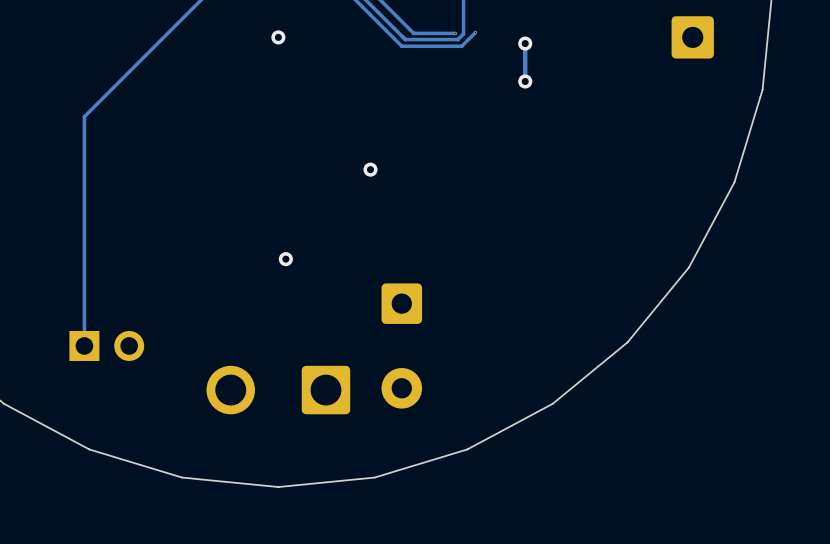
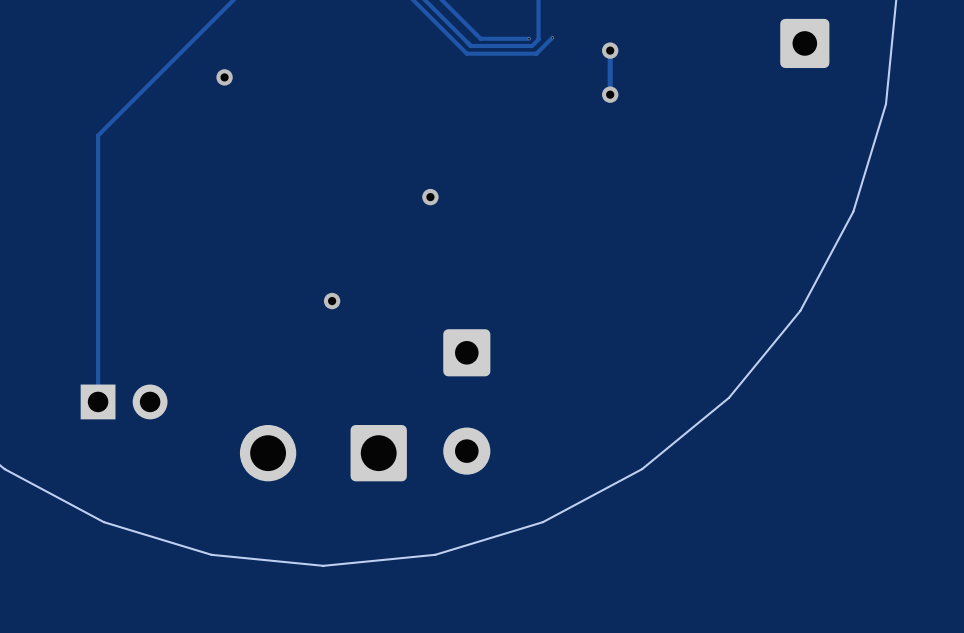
via: (278, 37) -> none
via: none -> (224, 77)

